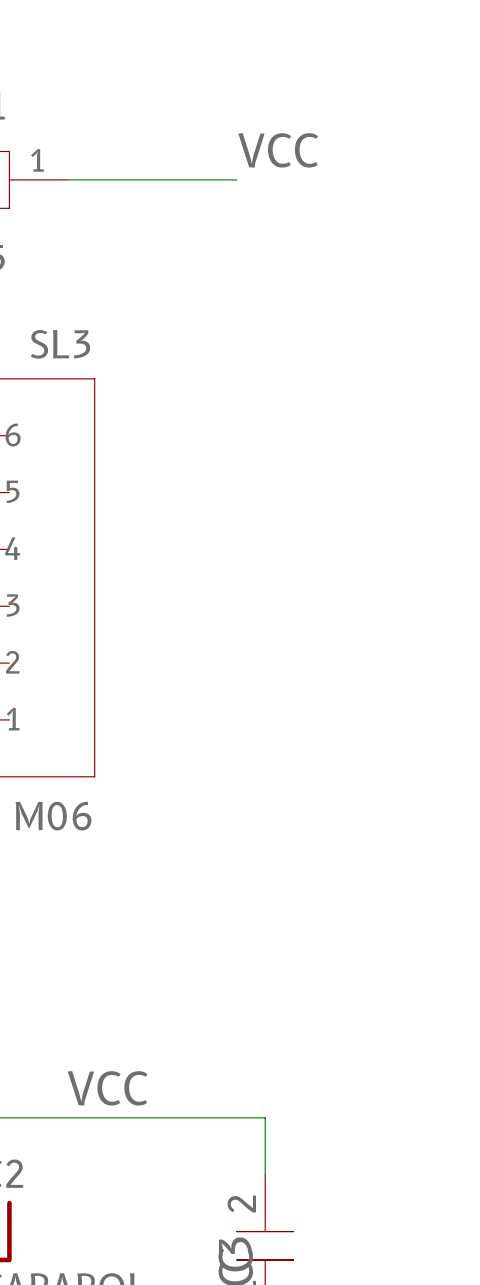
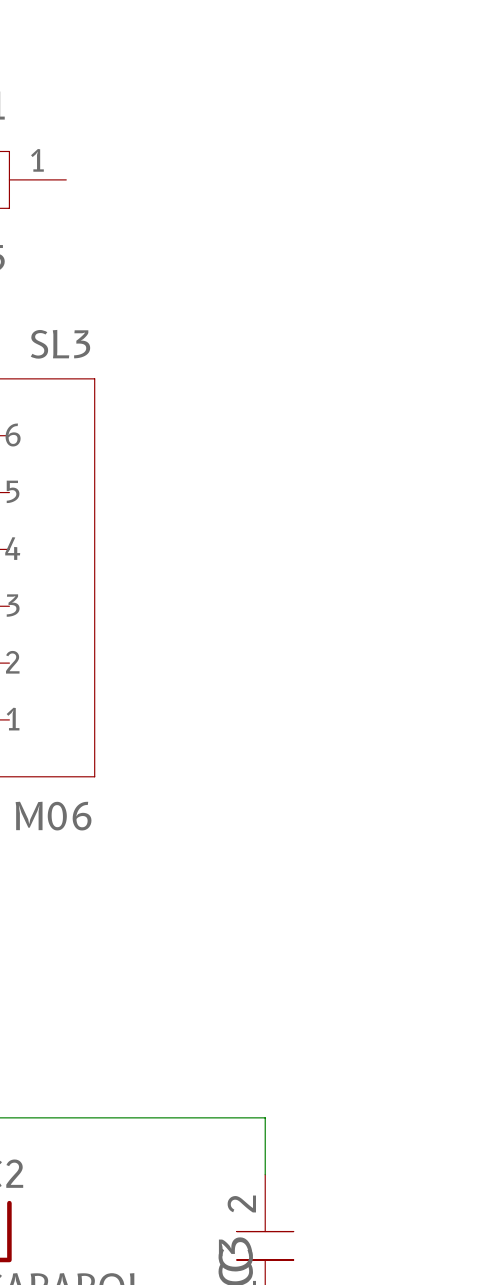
label: VCC (278, 150) -> none
wire: (66, 179) (236, 179) -> none
label: VCC (107, 1088) -> none

